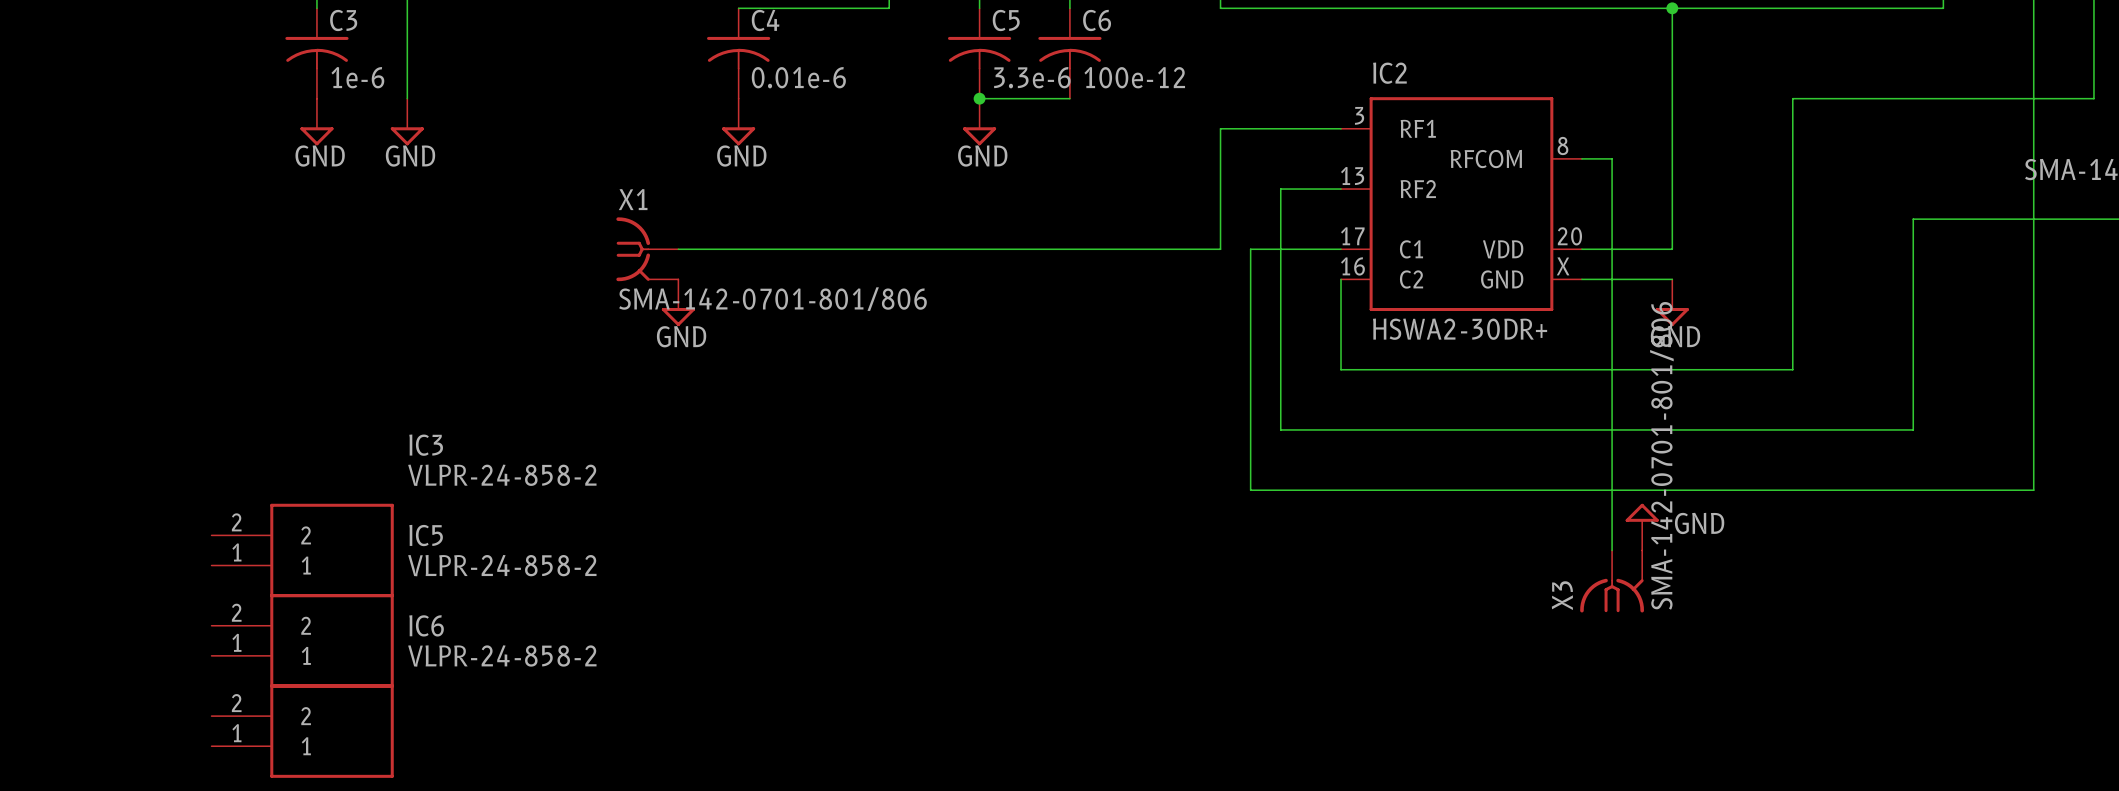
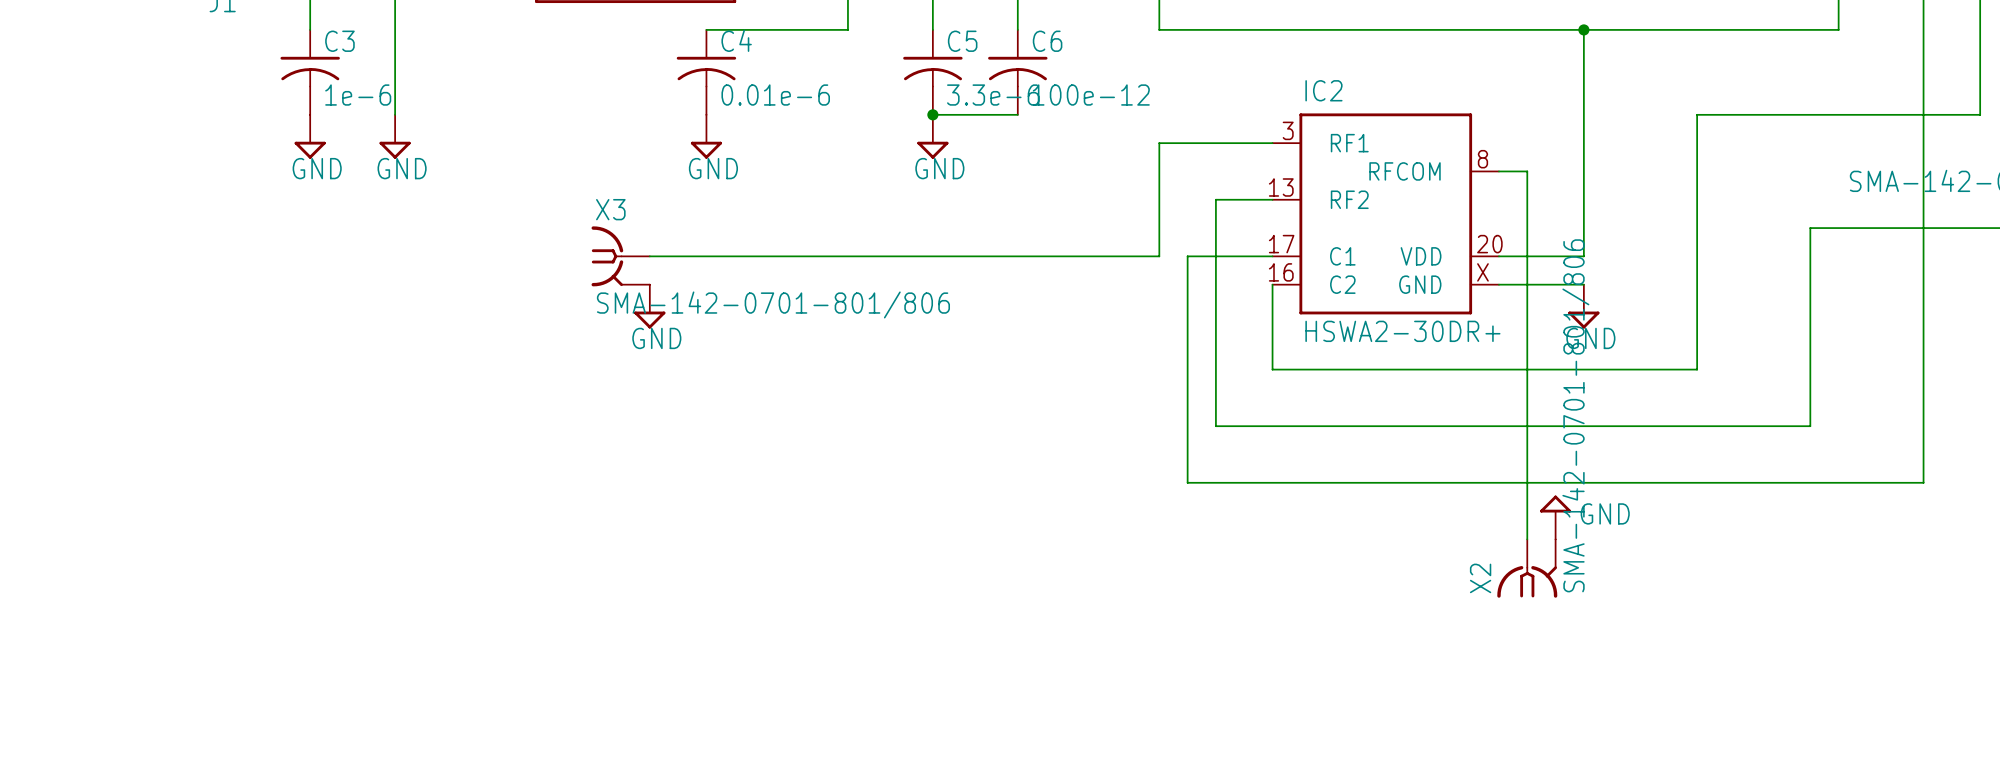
X1 name: X1 (633, 199) -> X3 (610, 209)
IC3: VLPR-24-858-2 (302, 550) -> none
X3 name: X3 (1562, 595) -> X2 (1480, 578)
IC5: VLPR-24-858-2 (302, 640) -> none
IC6: VLPR-24-858-2 (302, 731) -> none

